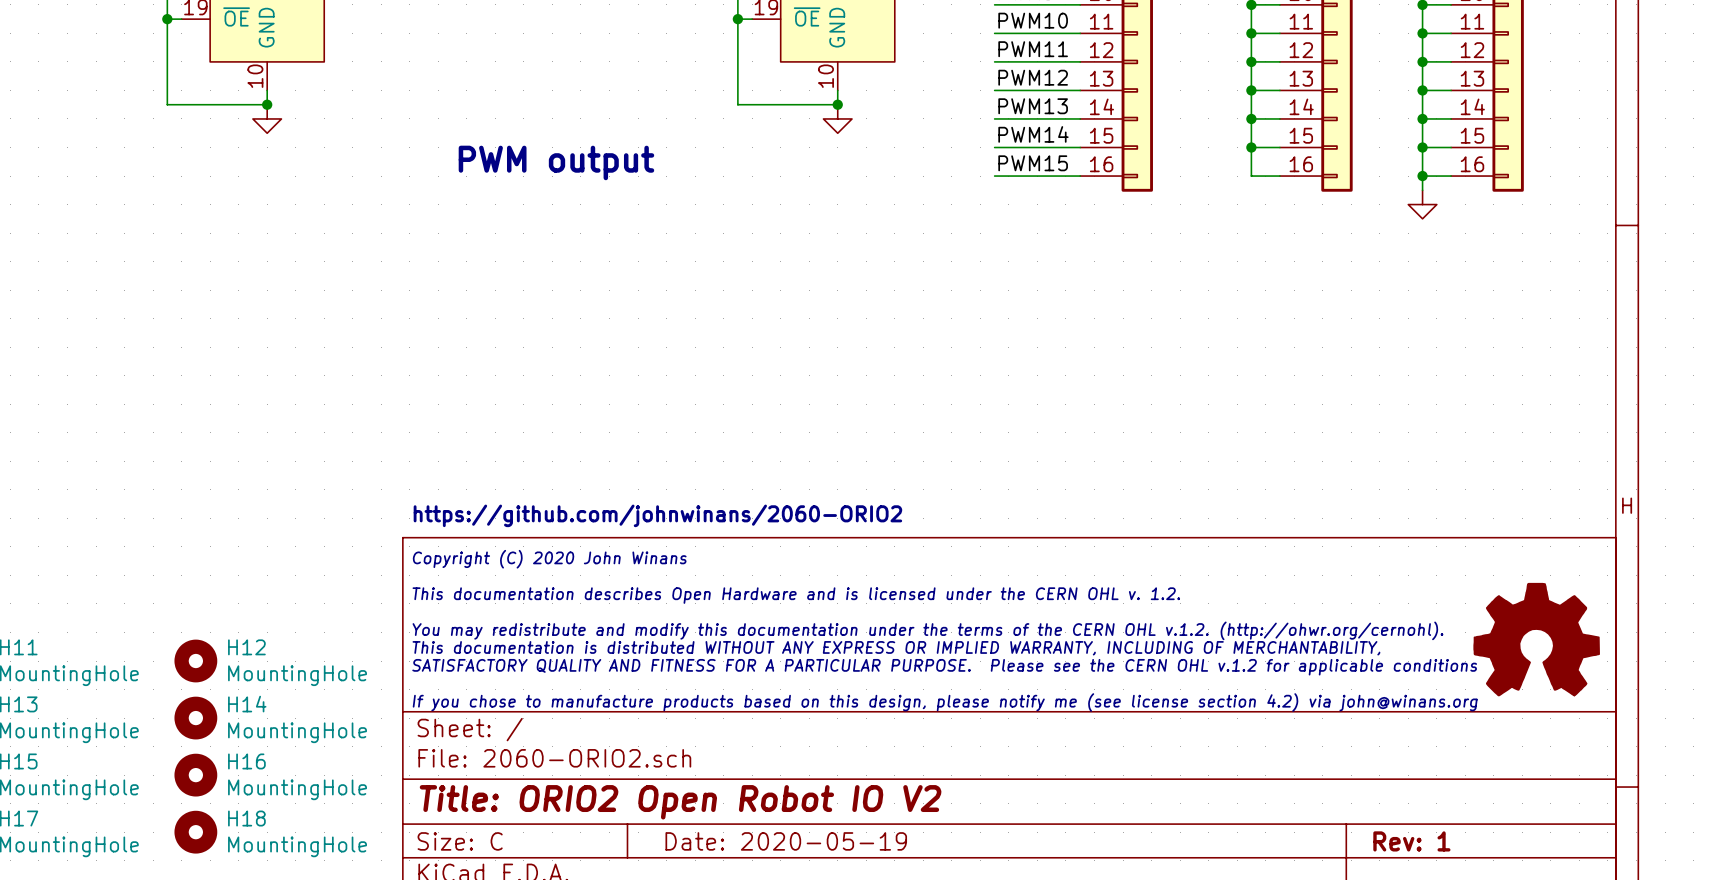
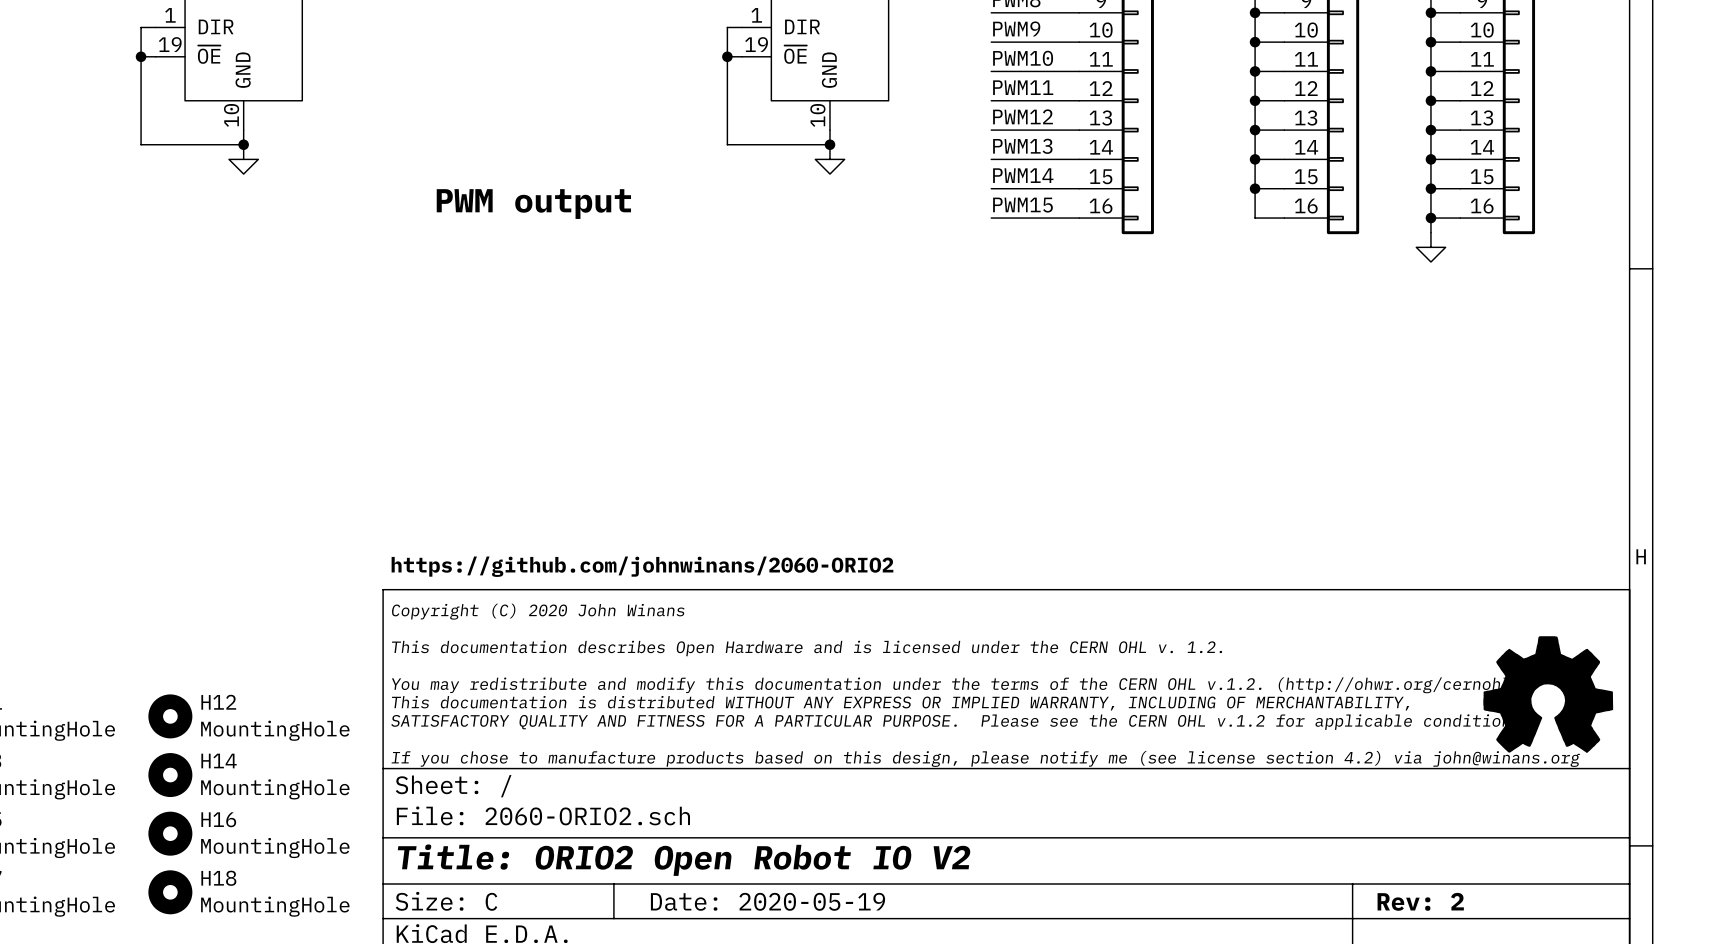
title block: Rev: 1 (1411, 841) -> Rev: 2 (1420, 901)

